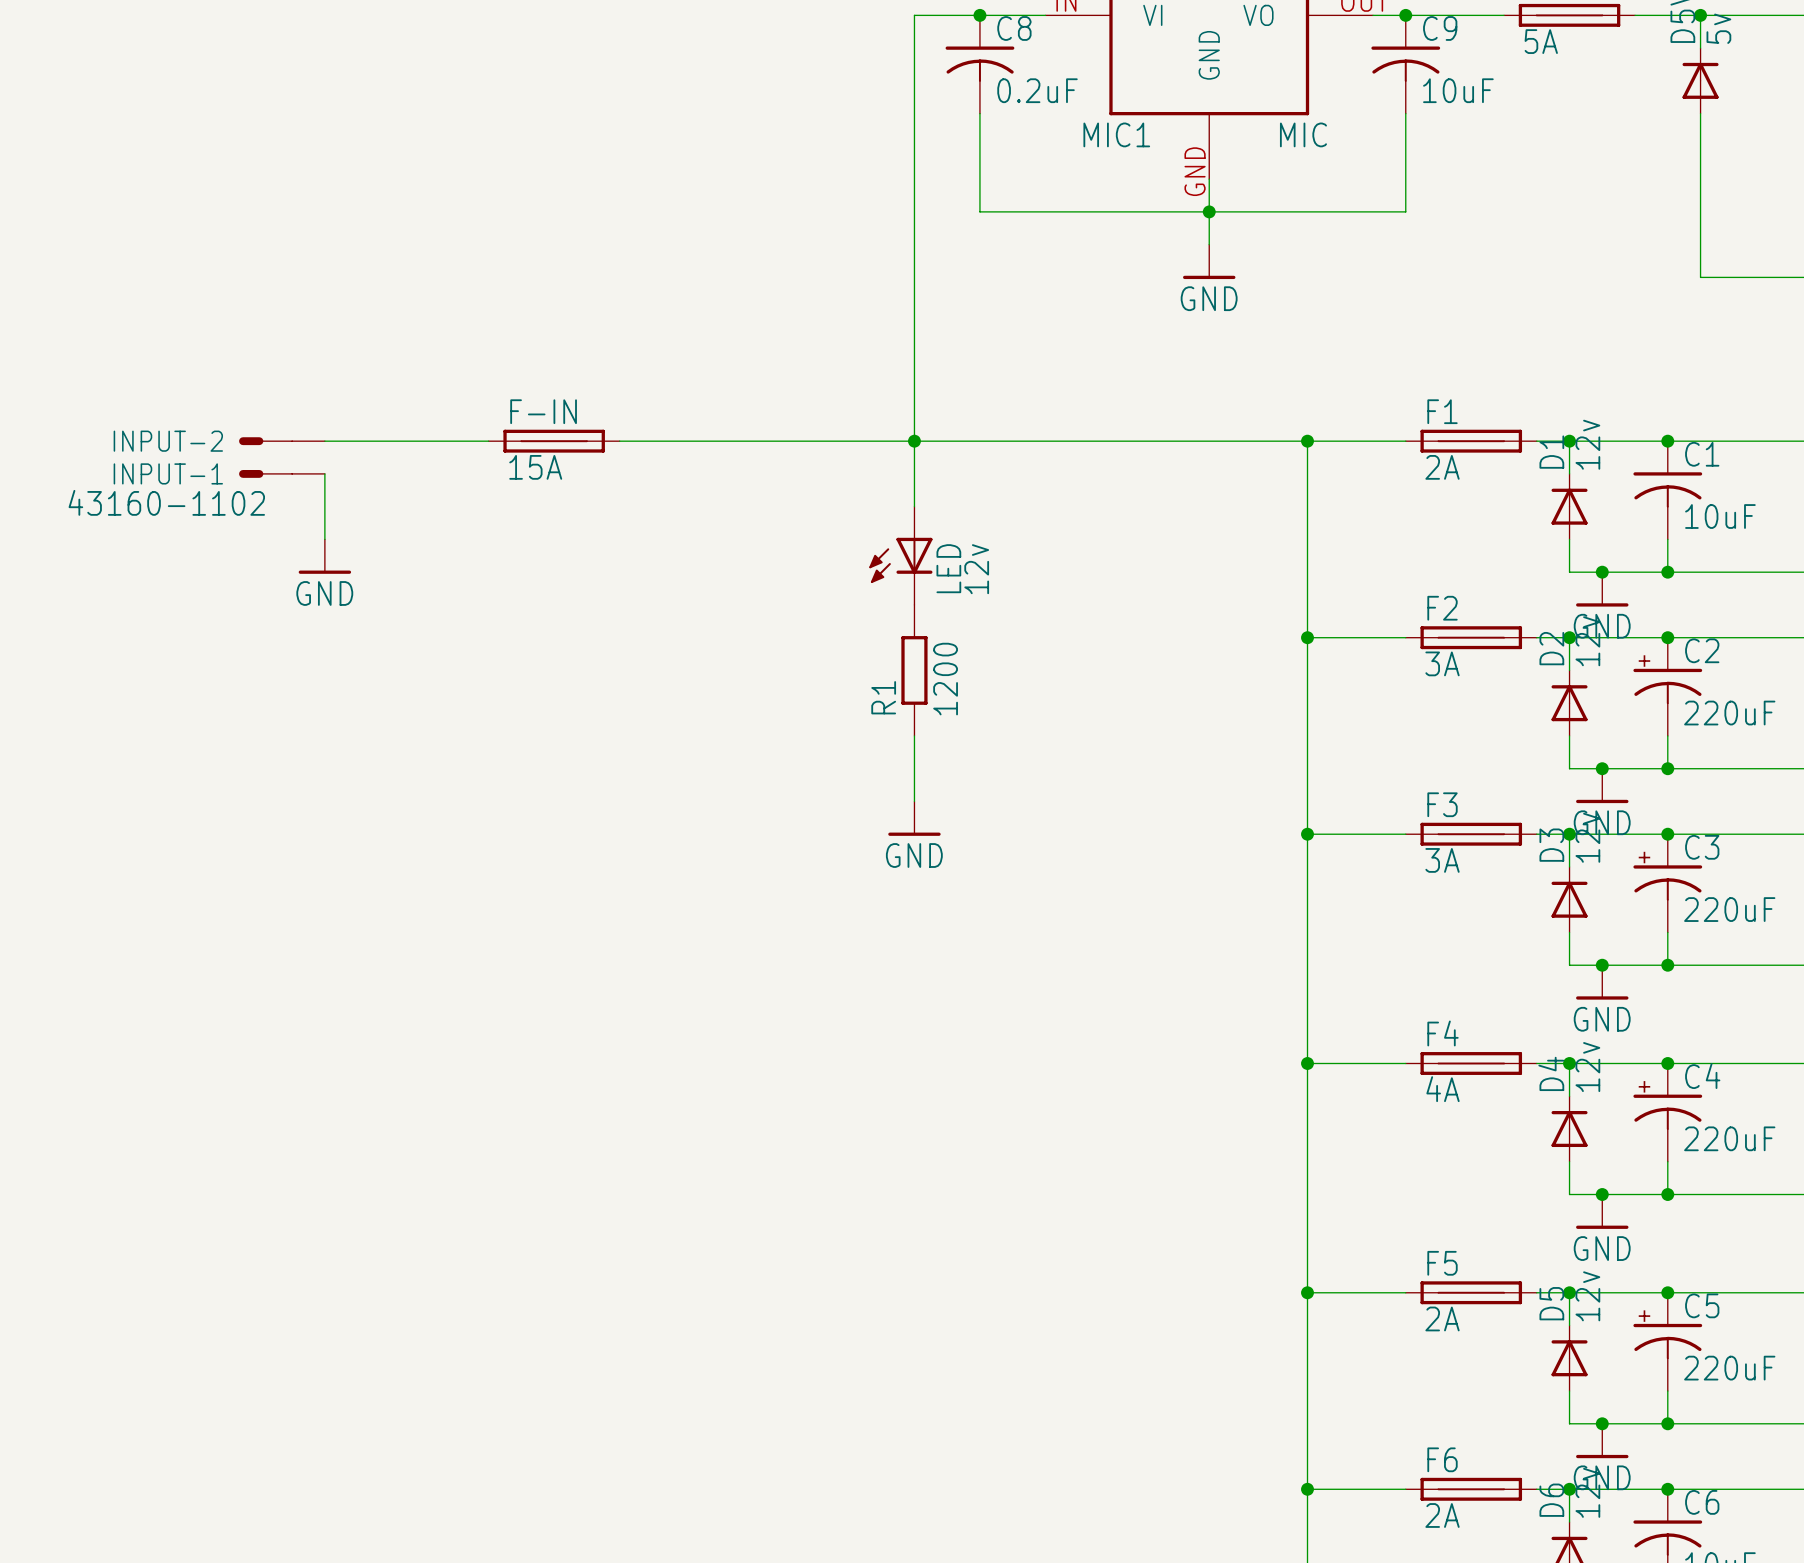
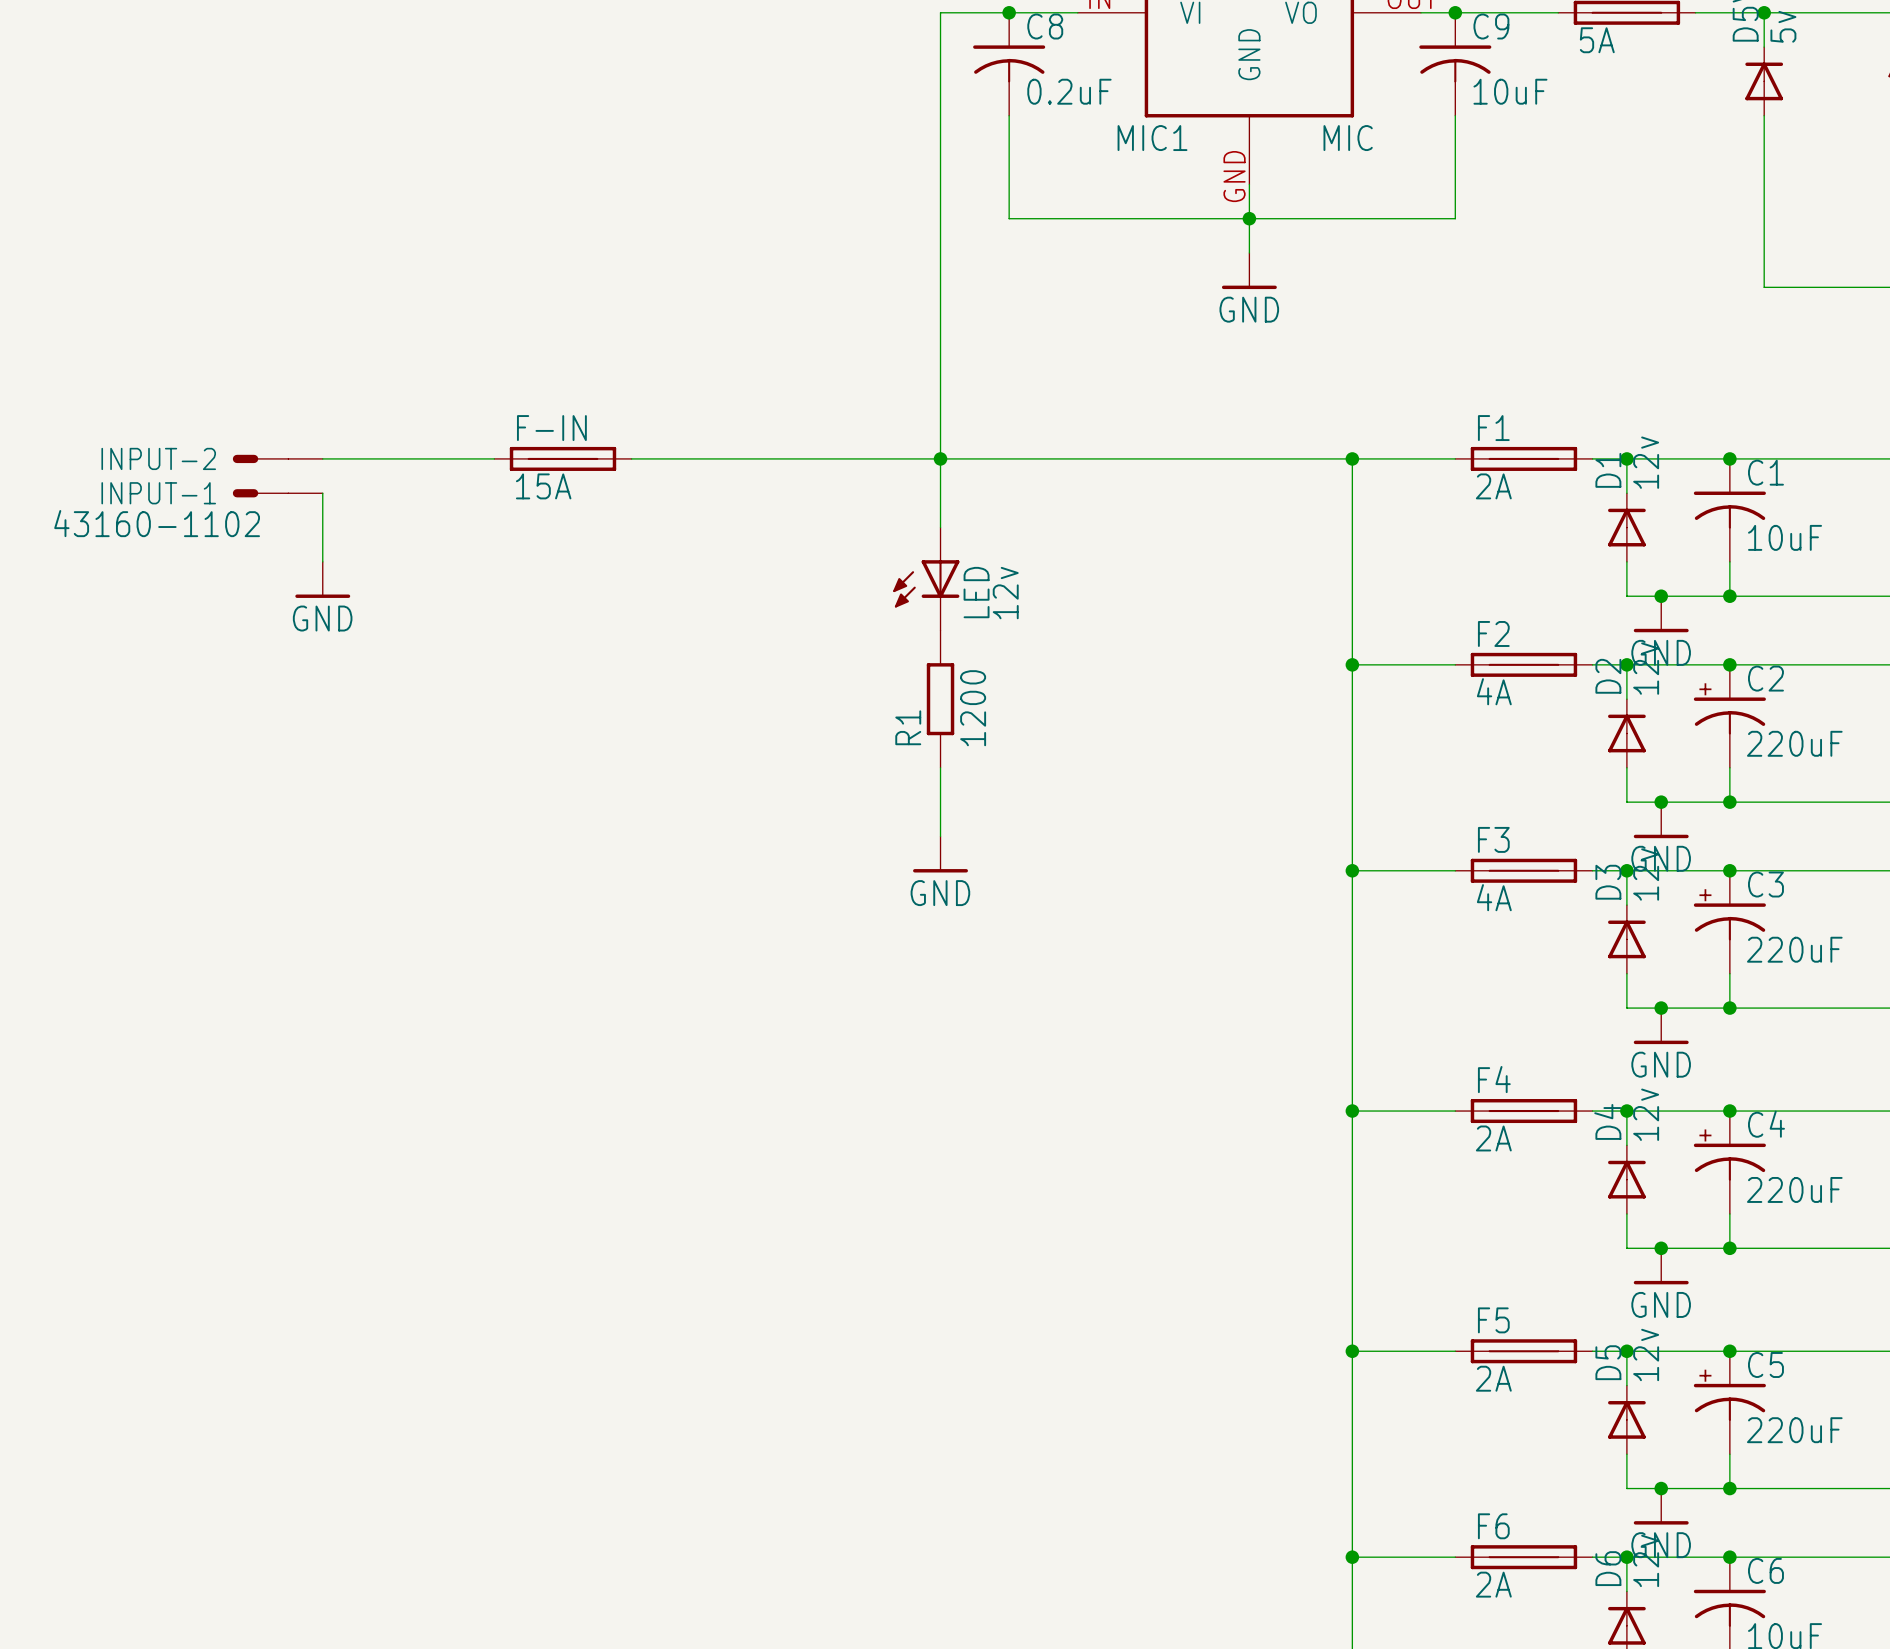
F2 value: 3A (1442, 663) -> 4A (1494, 691)
F3 value: 3A (1442, 860) -> 4A (1494, 897)
F4 value: 4A (1443, 1089) -> 2A (1493, 1138)

